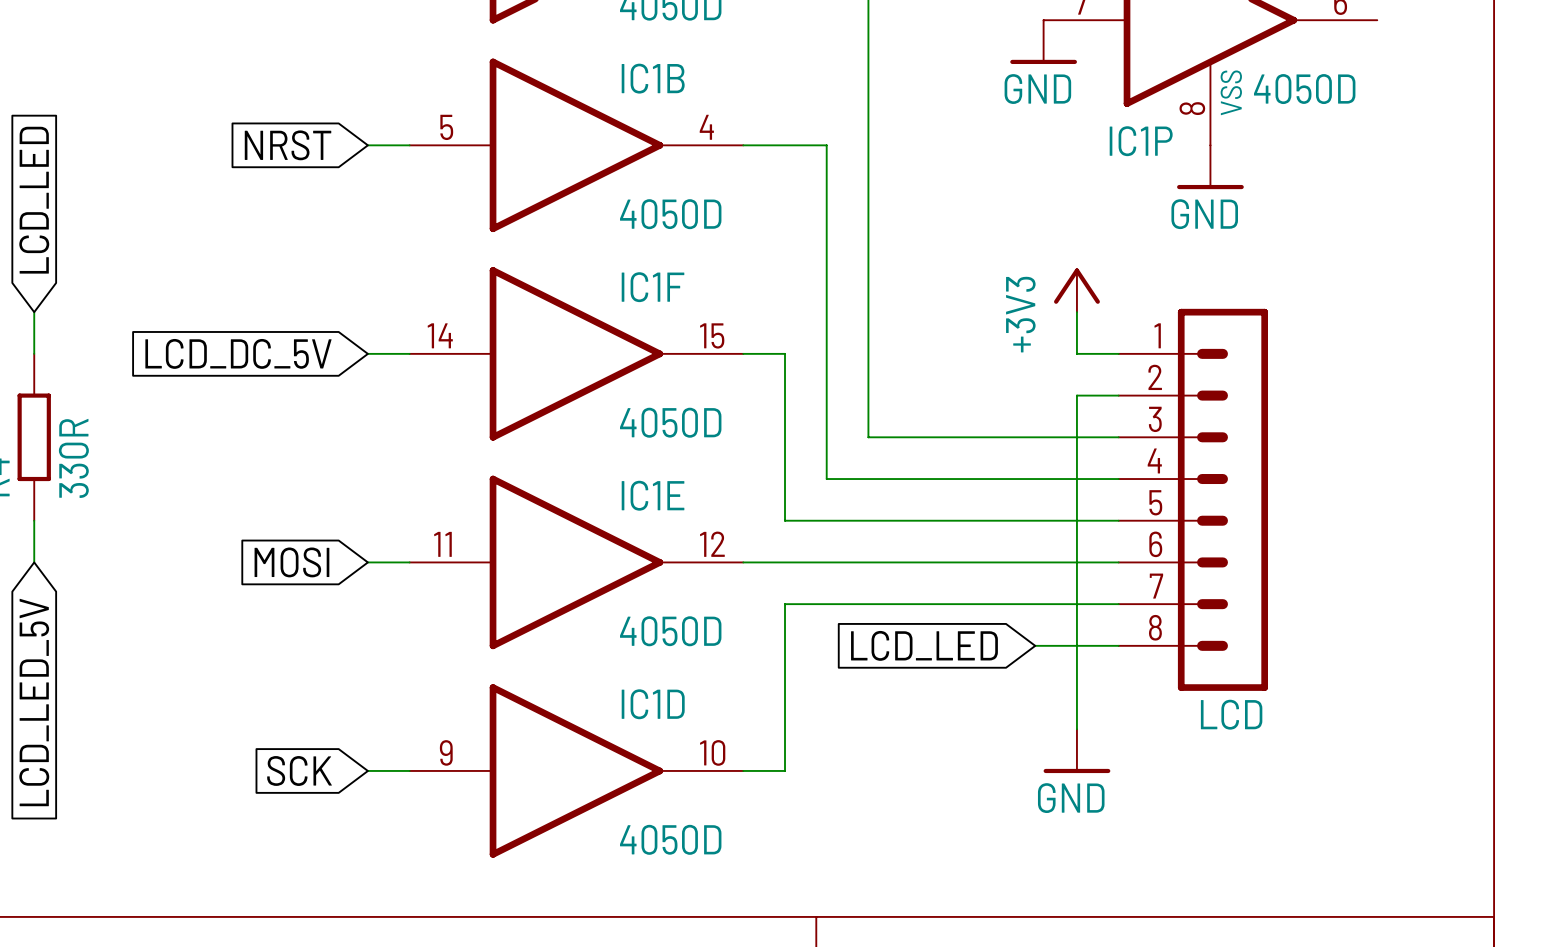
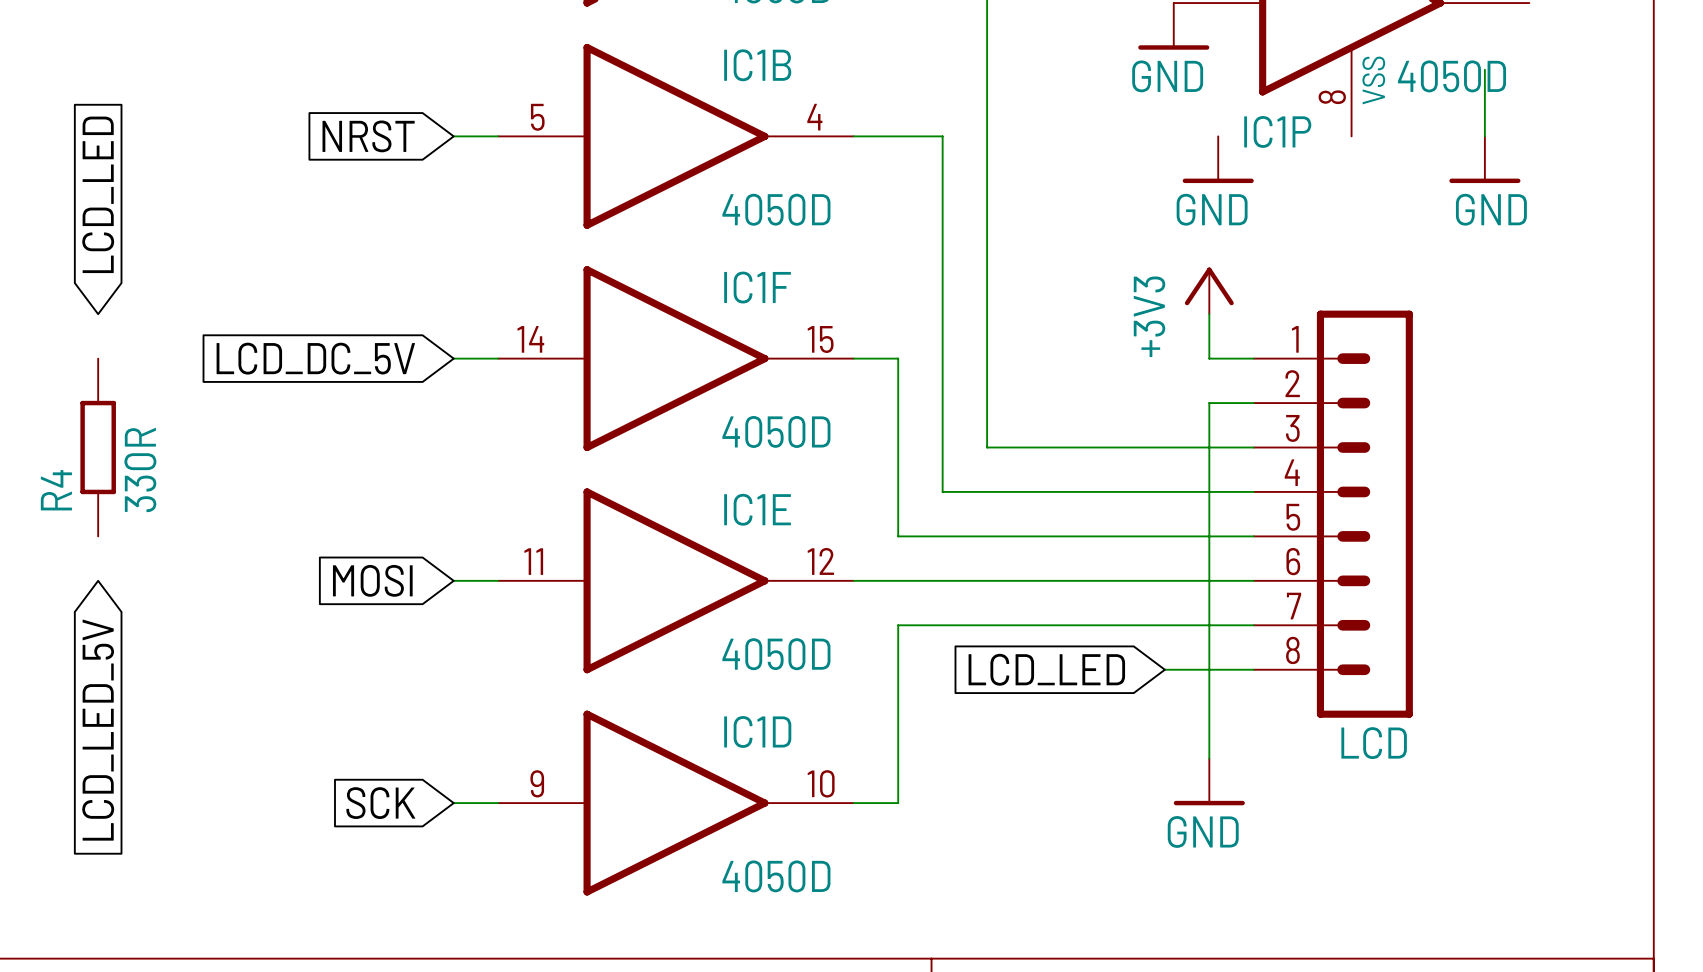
wire: none -> (1484, 69) (1484, 136)
power symbol: none -> GND (1218, 159)
power symbol: GND (1210, 167) -> none
power symbol: none -> GND (1484, 159)
wire: (34, 312) (34, 353) -> none
wire: (34, 520) (34, 562) -> none

